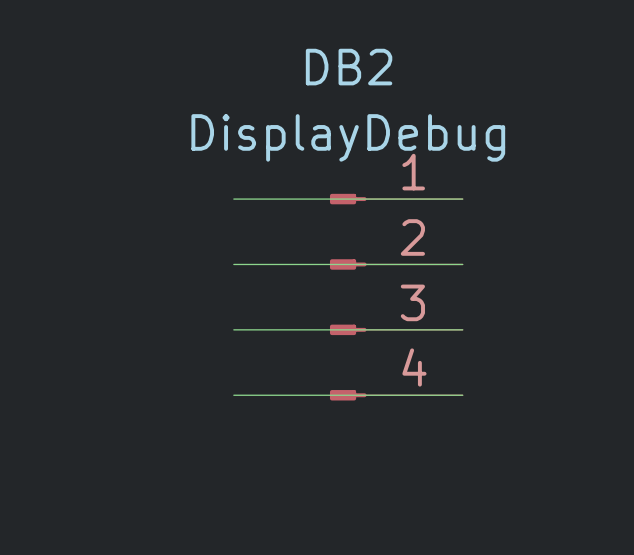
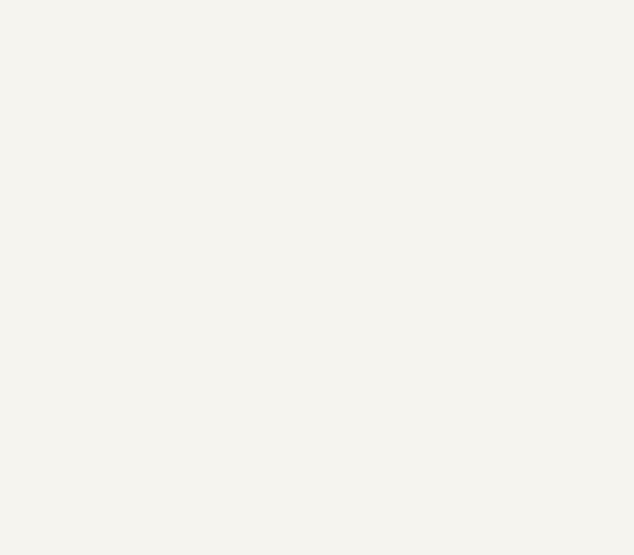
wire: (233, 199) (462, 199) -> none
wire: (233, 264) (462, 264) -> none
DB2: DisplayDebug (396, 297) -> none
wire: (233, 329) (462, 329) -> none
wire: (233, 395) (462, 395) -> none

